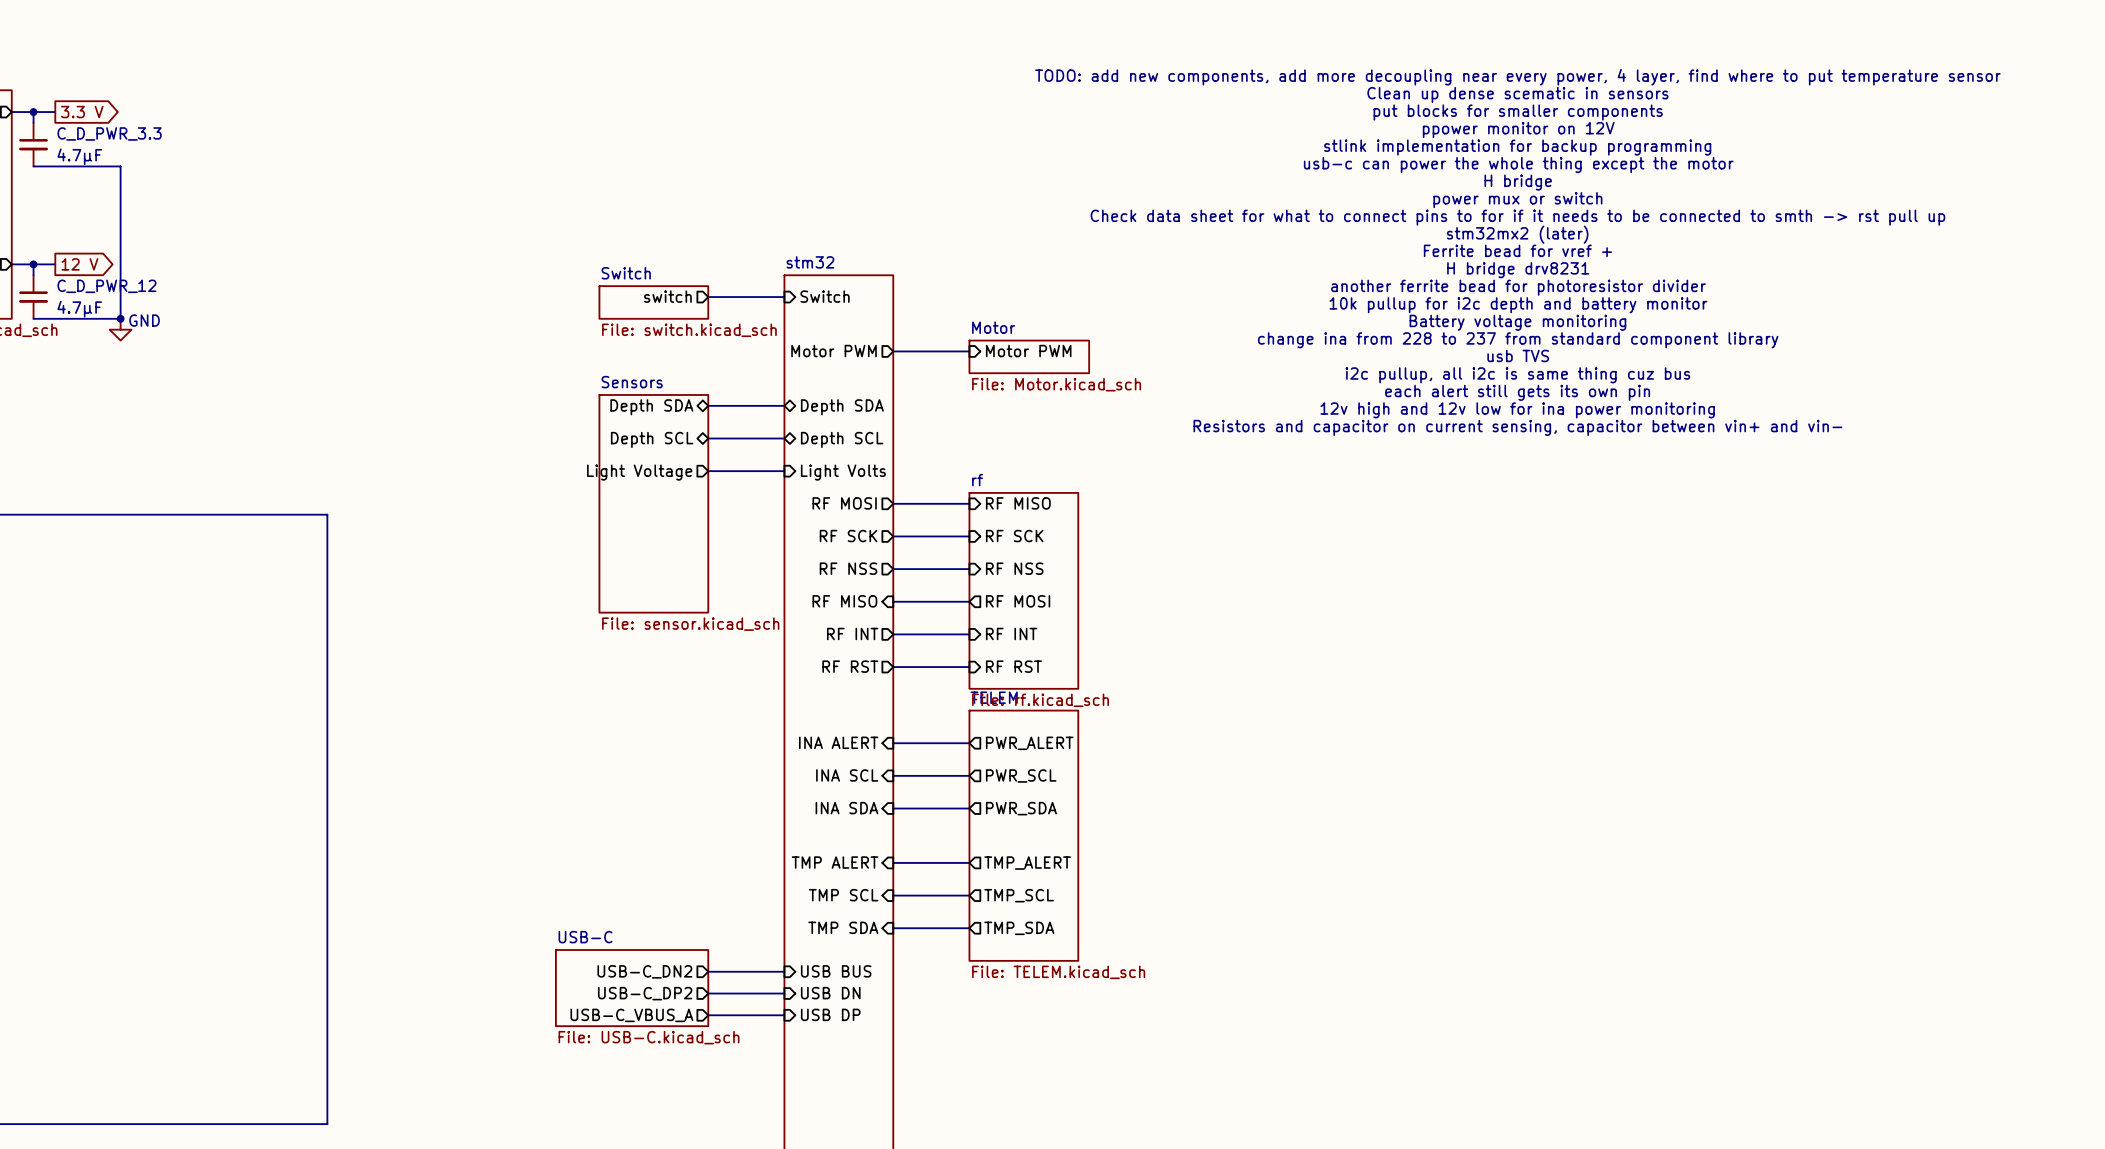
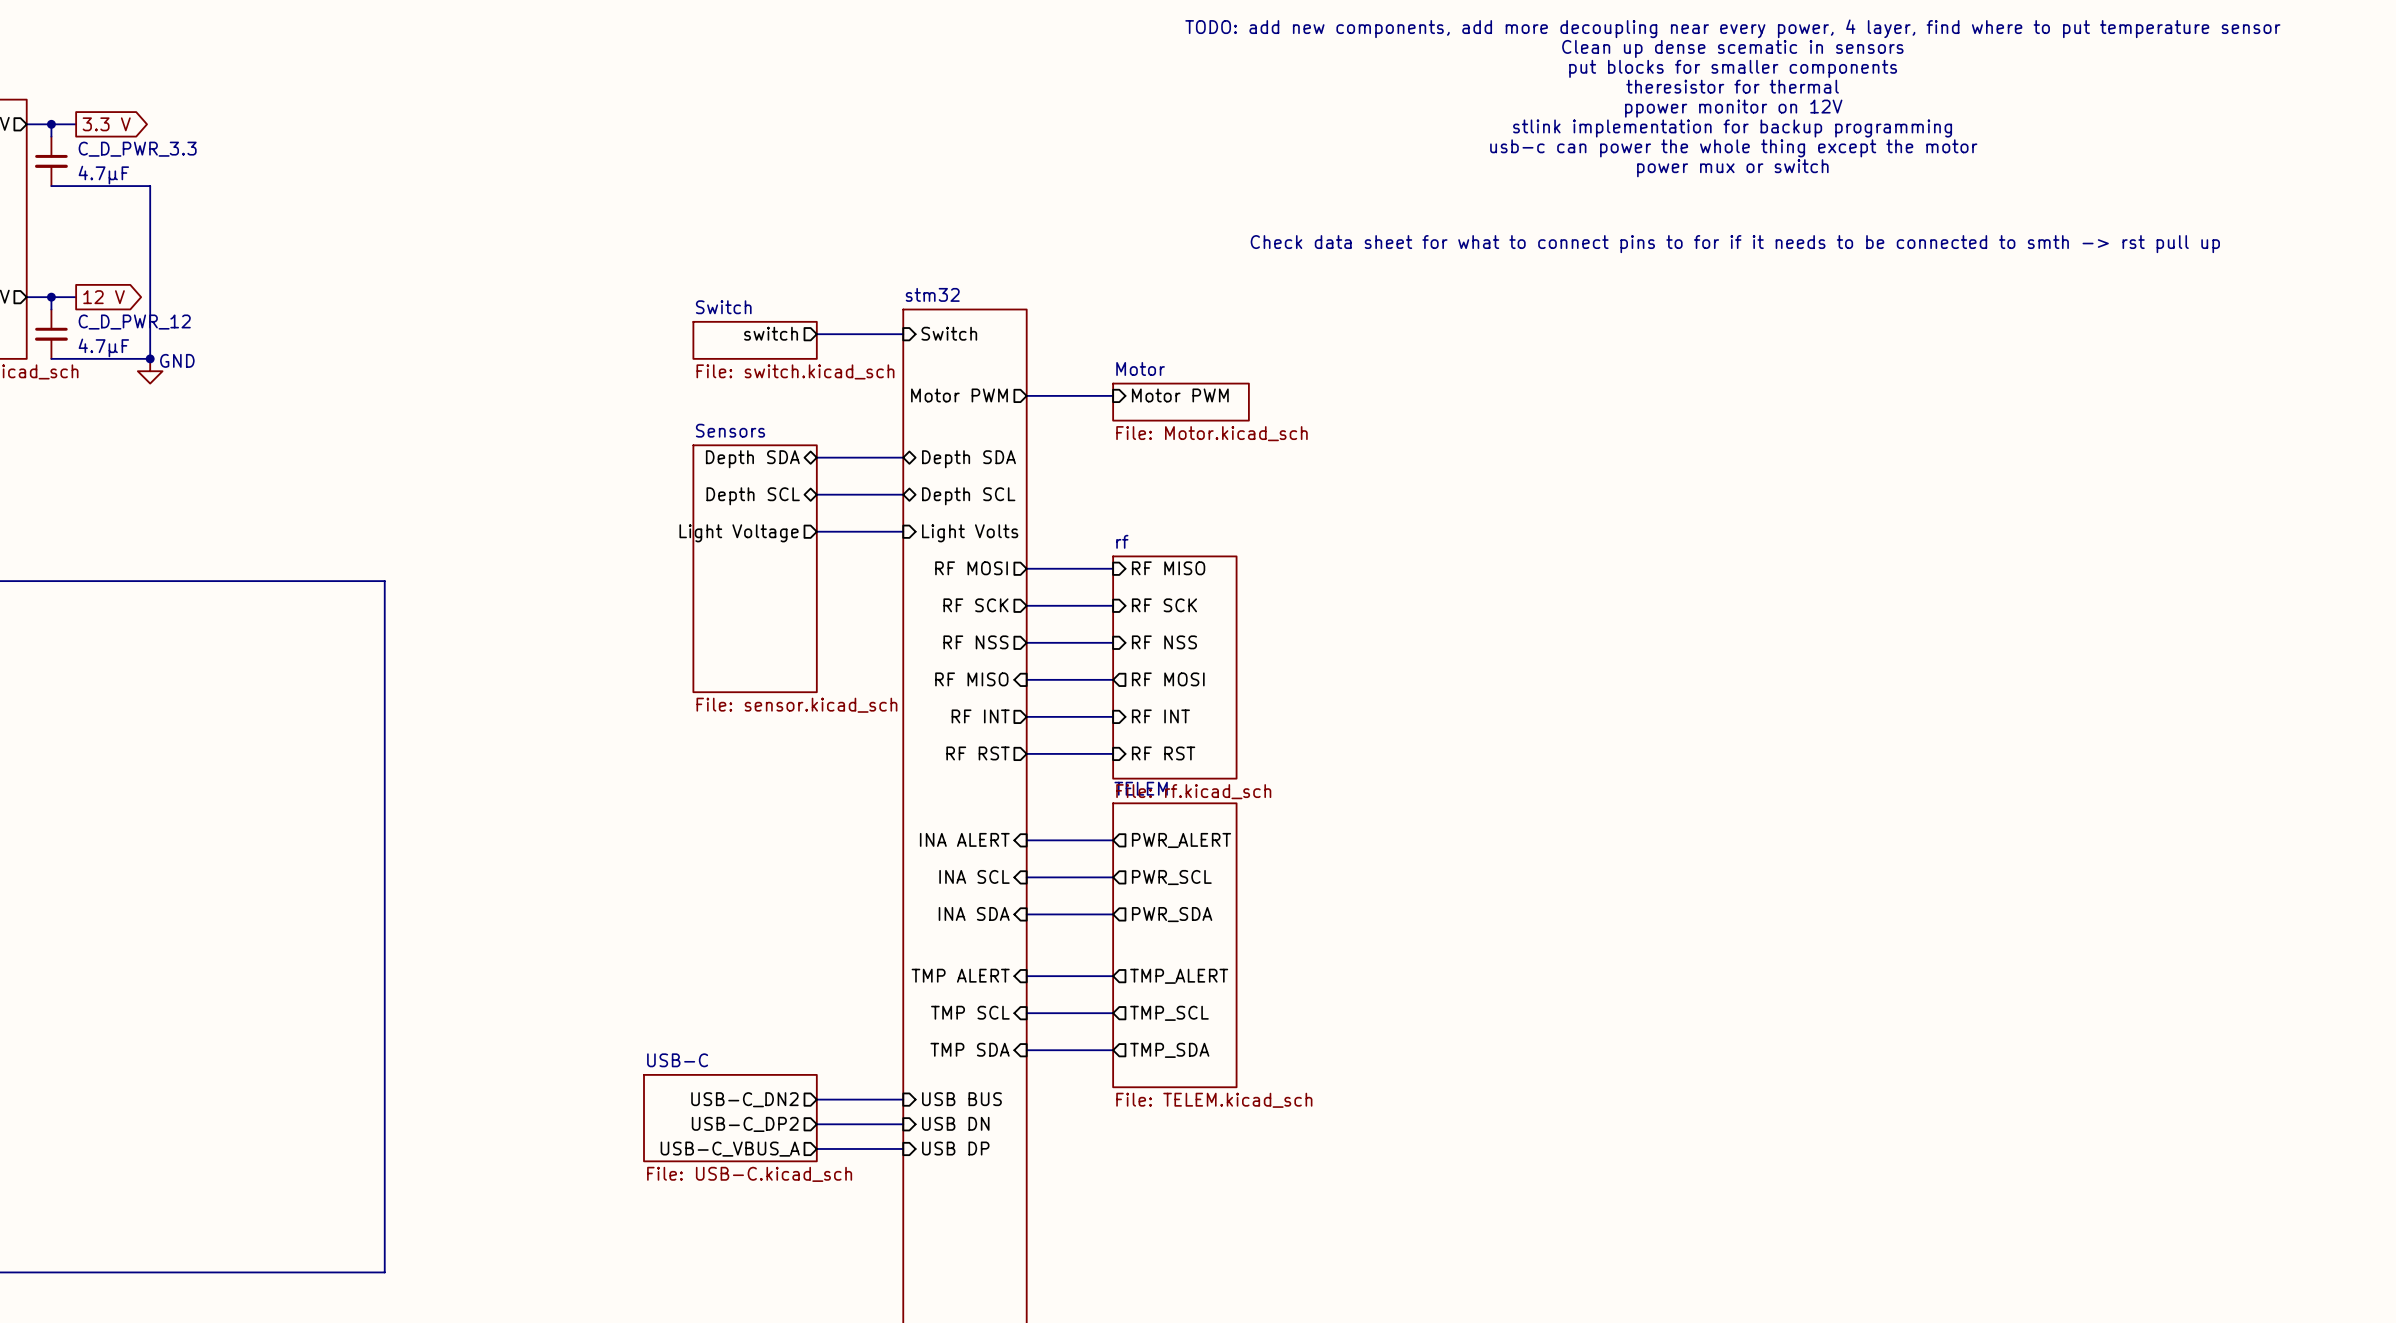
text position: TODO: add new components, add more decoupling near every power, 4 layer, find where to put temperature sensor (1517, 77) -> TODO: add new components, add more decoupling near every power, 4 layer, find where to put temperature sensor (1732, 28)
text: none -> theresistor for thermal (1732, 86)
text position: Clean up dense scematic in sensors (1517, 94) -> Clean up dense scematic in sensors (1732, 48)
text position: put blocks for smaller components (1518, 112) -> put blocks for smaller components (1733, 68)
text position: ppower monitor on 12V (1518, 130) -> ppower monitor on 12V (1733, 108)
text position: stlink implementation for backup programming (1517, 147) -> stlink implementation for backup programming (1732, 128)
text position: usb-c can power the whole thing except the motor (1518, 165) -> usb-c can power the whole thing except the motor (1733, 148)
text: H bridge (1518, 182) -> none
text position: power mux or switch (1517, 200) -> power mux or switch (1732, 168)
text: stm32mx2 (later) (1517, 234) -> none
text: Ferrite bead for vref + (1517, 250) -> none
text: H bridge drv8231 (1518, 270) -> none
text: another ferrite bead for photoresistor divider (1518, 287) -> none
text: 10k pullup for i2c depth and battery monitor (1518, 305) -> none
text: Battery voltage monitoring (1517, 322) -> none
text: change ina from 228 to 237 from standard component library (1518, 340) -> none
text: usb TVS (1518, 355) -> none
text: i2c pullup, all i2c is same thing cuz bus (1517, 375) -> none
text: each alert still gets its own pin (1517, 392) -> none
text: 12v high and 12v low for ina power monitoring (1517, 410) -> none
text: Resistors and capacitor on current sensing, capacitor between vin+ and vin- (1517, 427) -> none

